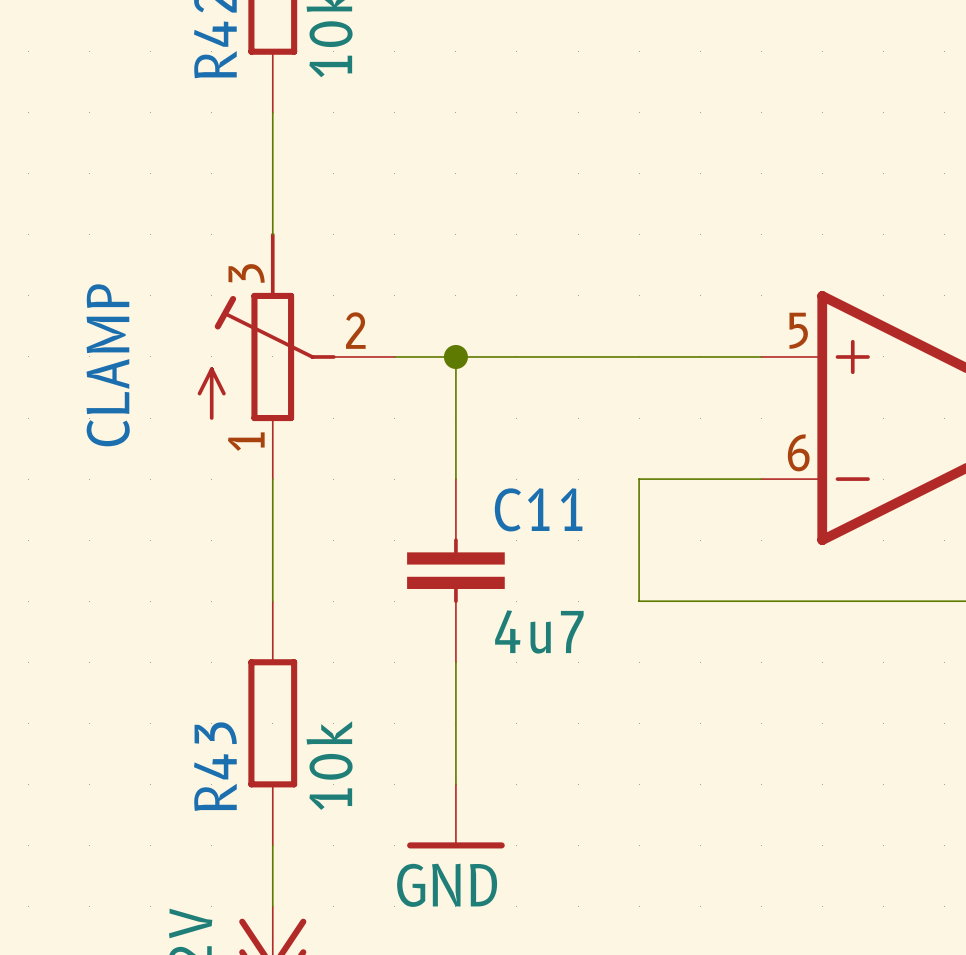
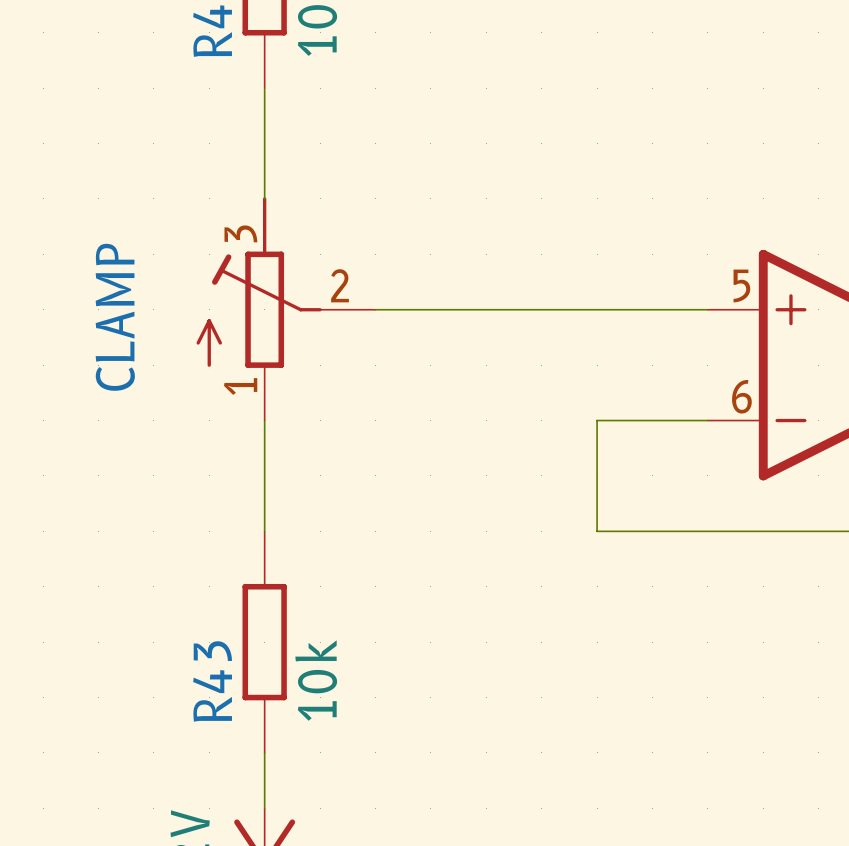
wire: (455, 356) (455, 479) -> none
junction: (455, 356) -> none
C11: 4u7 (455, 570) -> none
wire: (455, 662) (455, 784) -> none
power symbol: GND (455, 816) -> none

